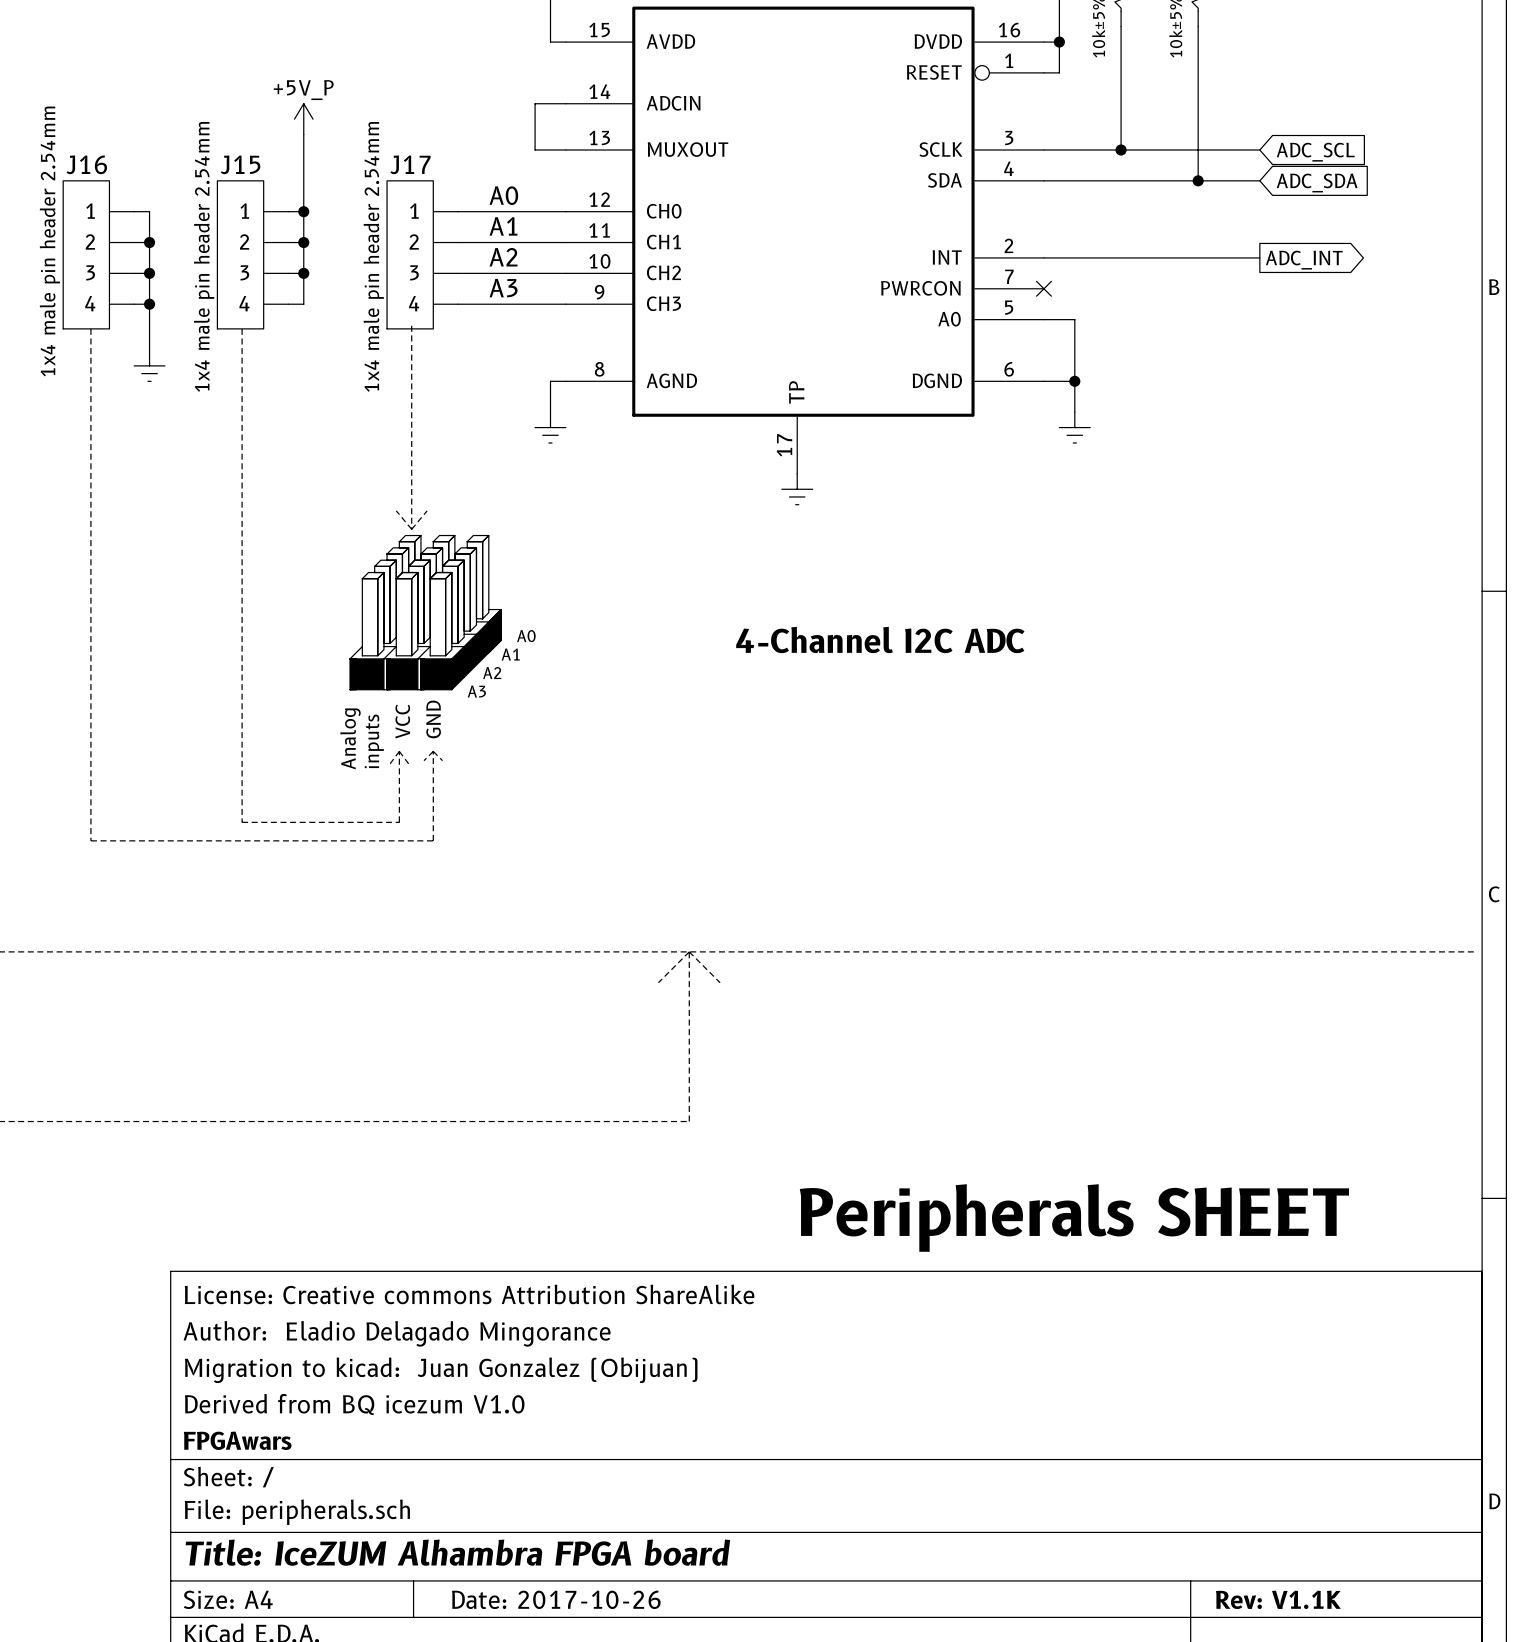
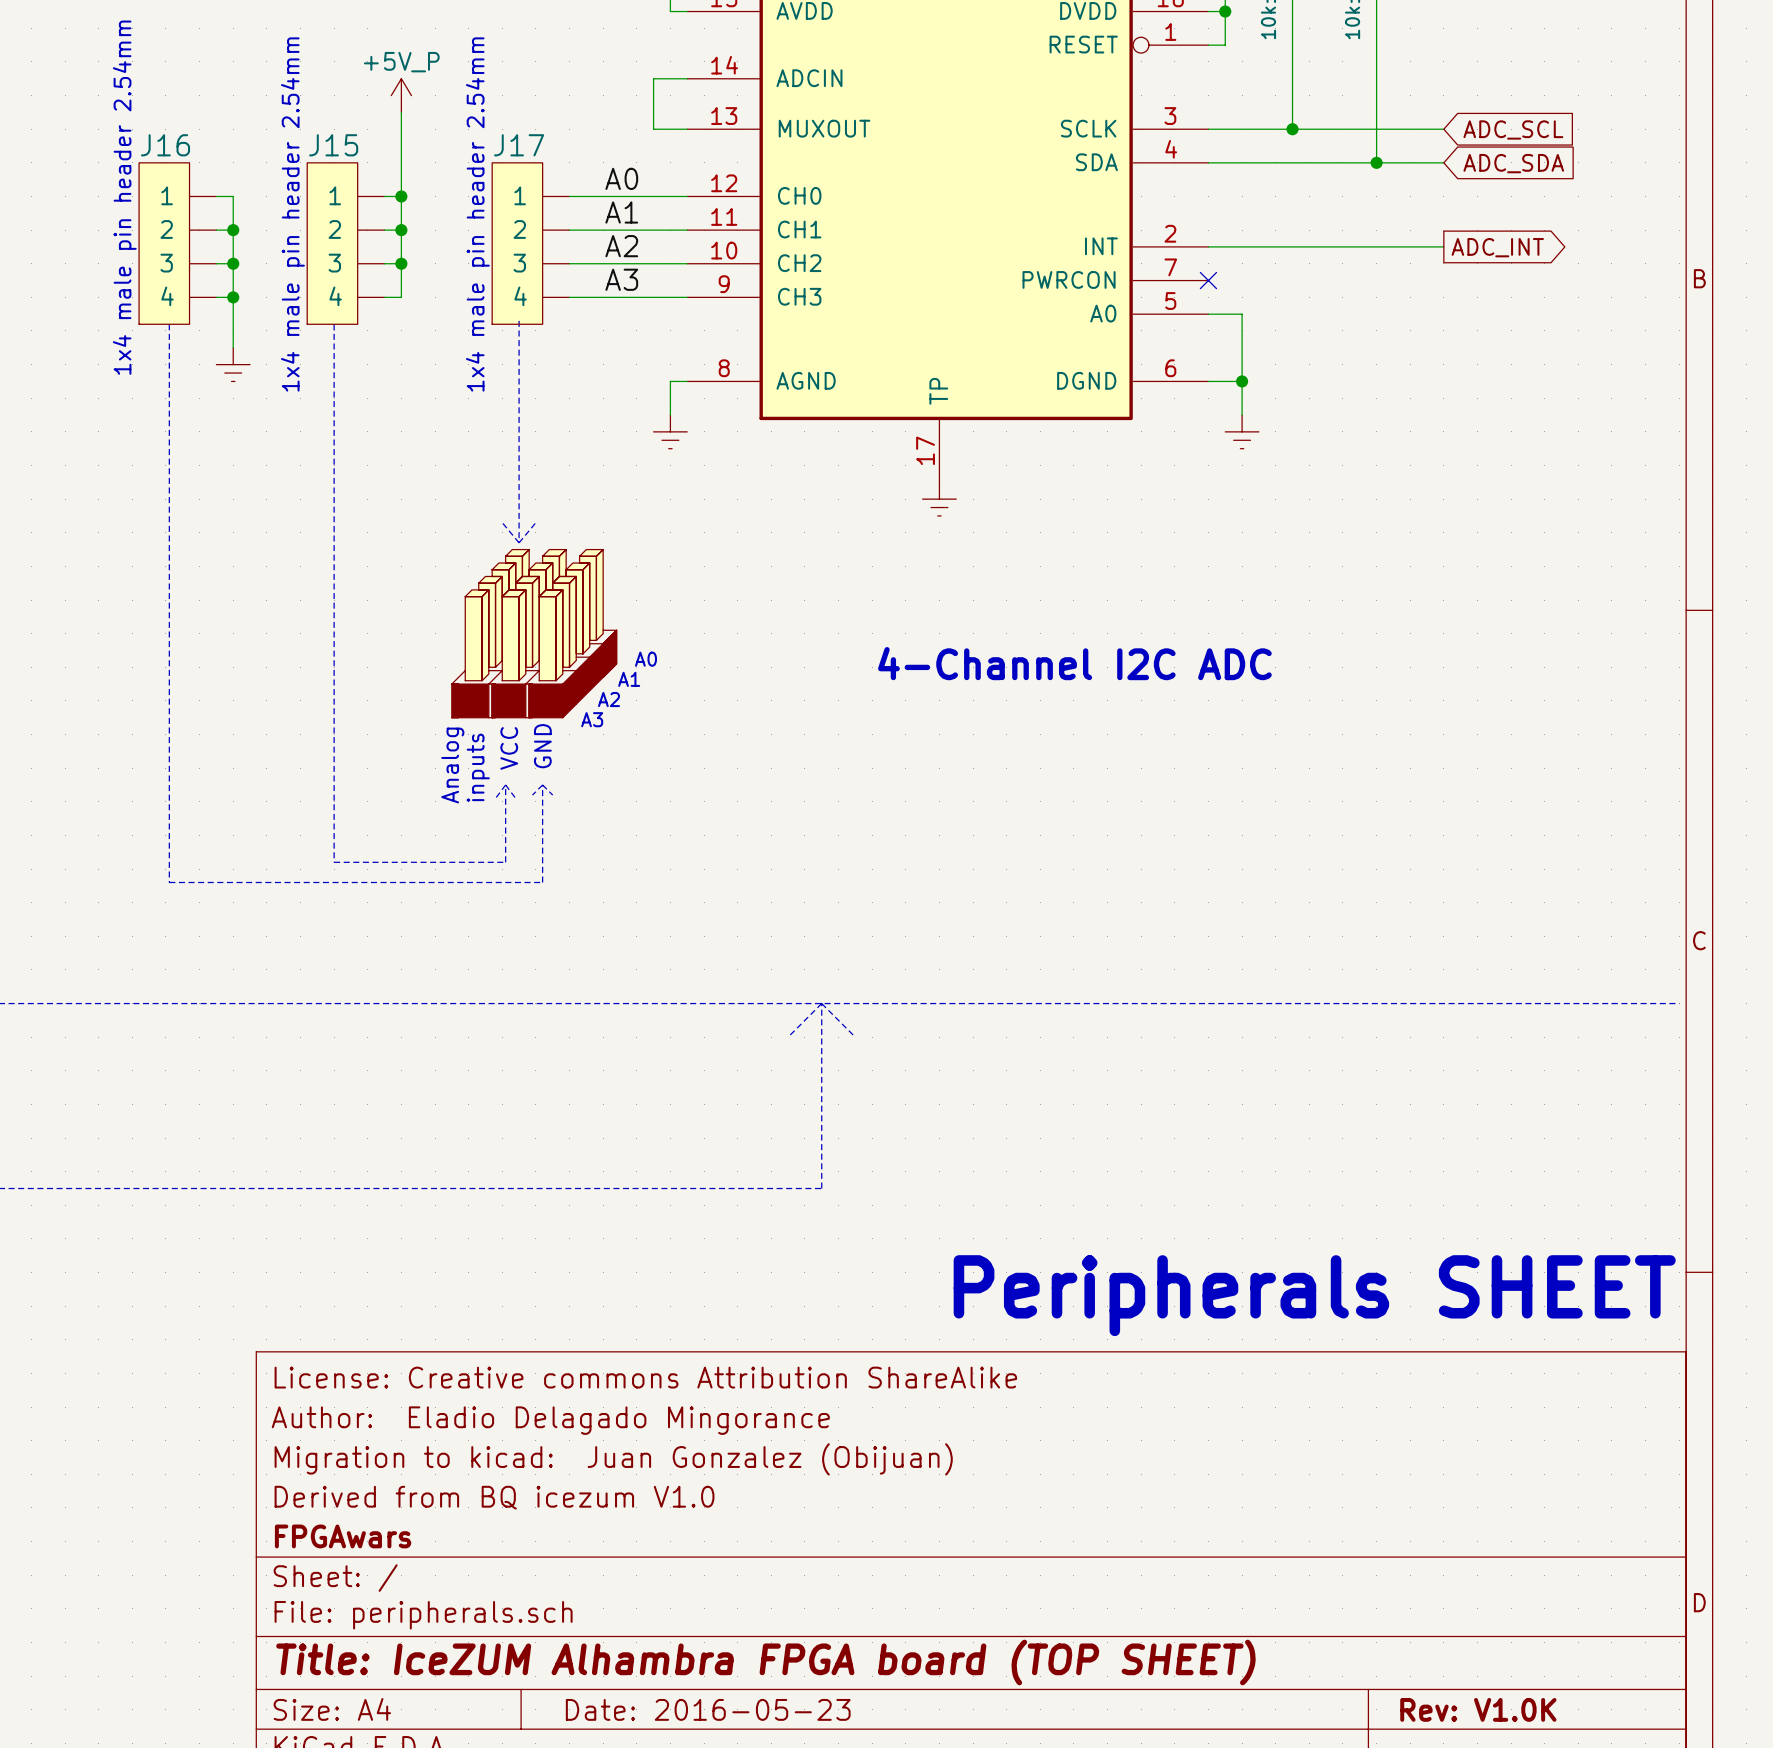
title block: Title: IceZUM Alhambra FPGA board (457, 1552) -> Title: IceZUM Alhambra FPGA board (TOP SHEET) (765, 1662)
title block: Date: 2017-10-26 (556, 1599) -> Date: 2016-05-23 (708, 1709)
title block: Rev: V1.1K (1278, 1599) -> Rev: V1.0K (1478, 1709)

